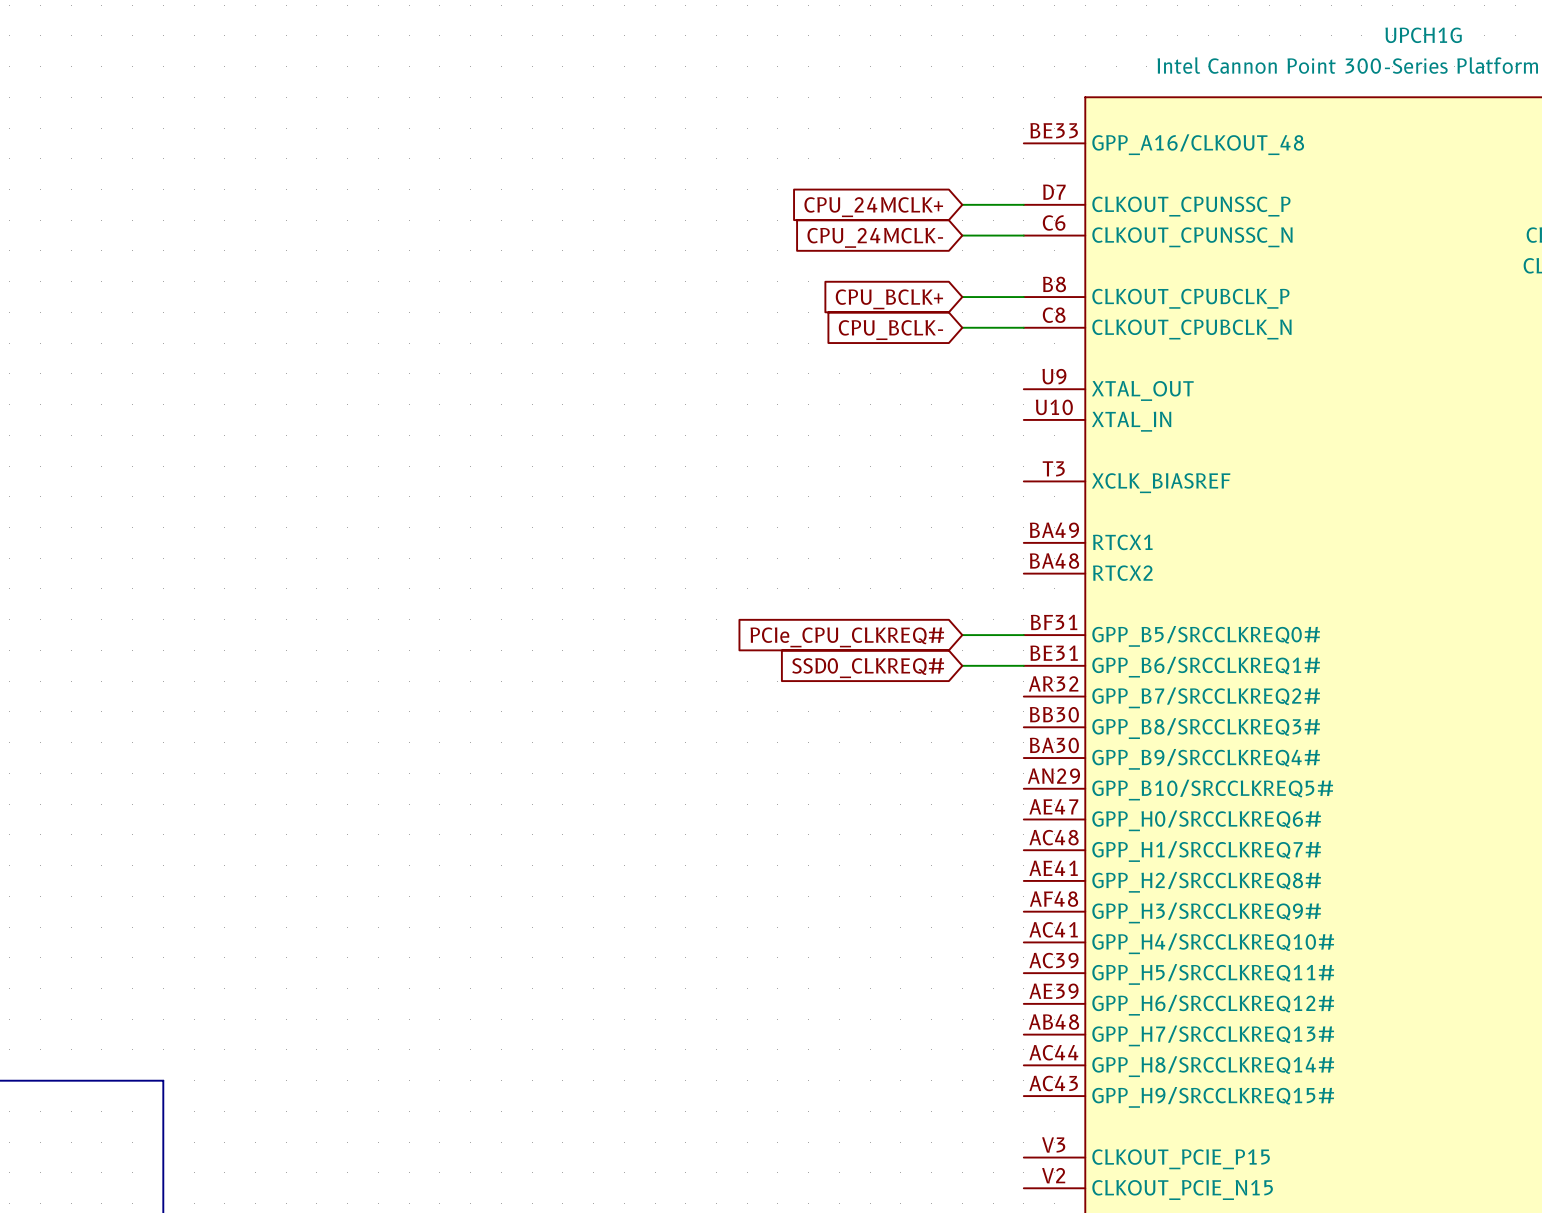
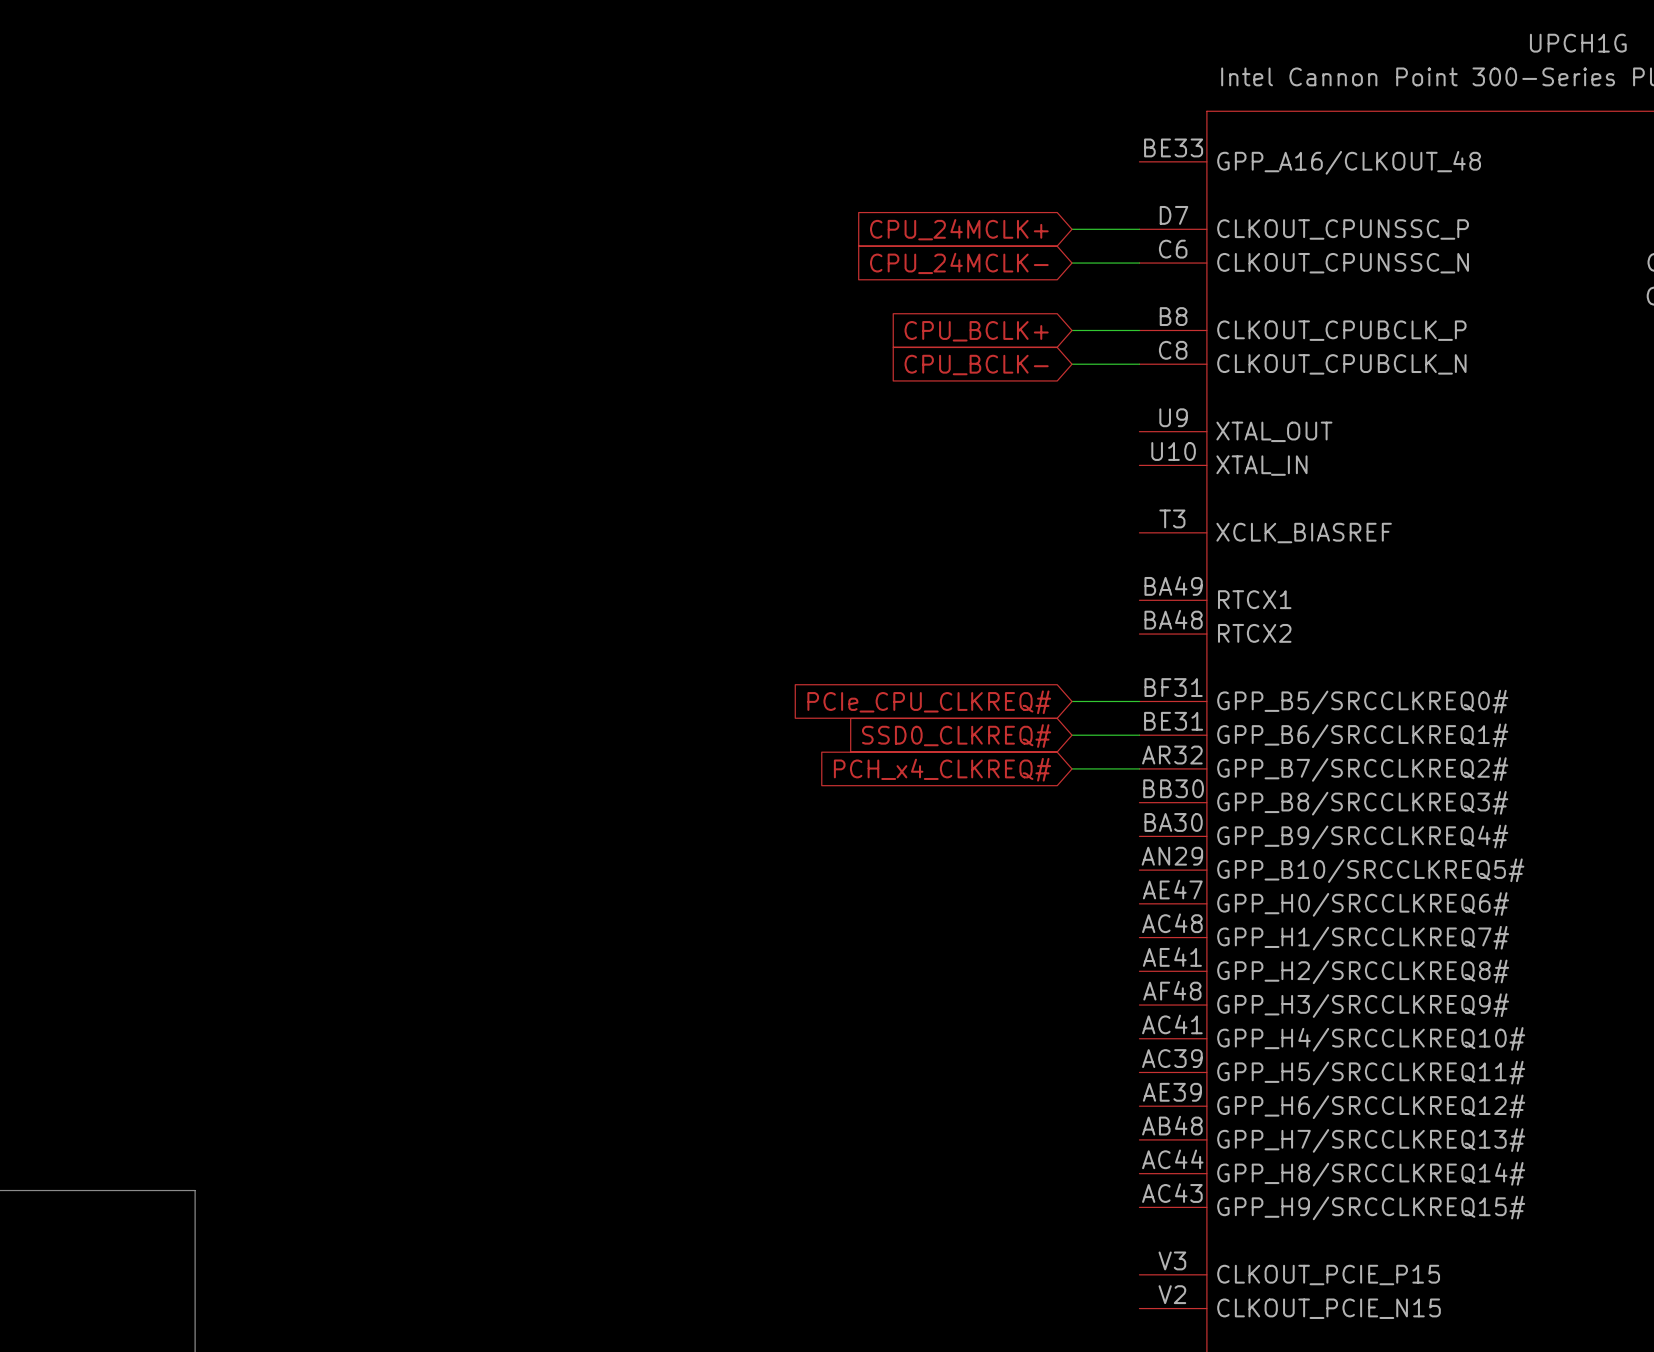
wire: none -> (1072, 768) (1139, 768)
global label: none -> PCH_x4_CLKREQ# (942, 769)

